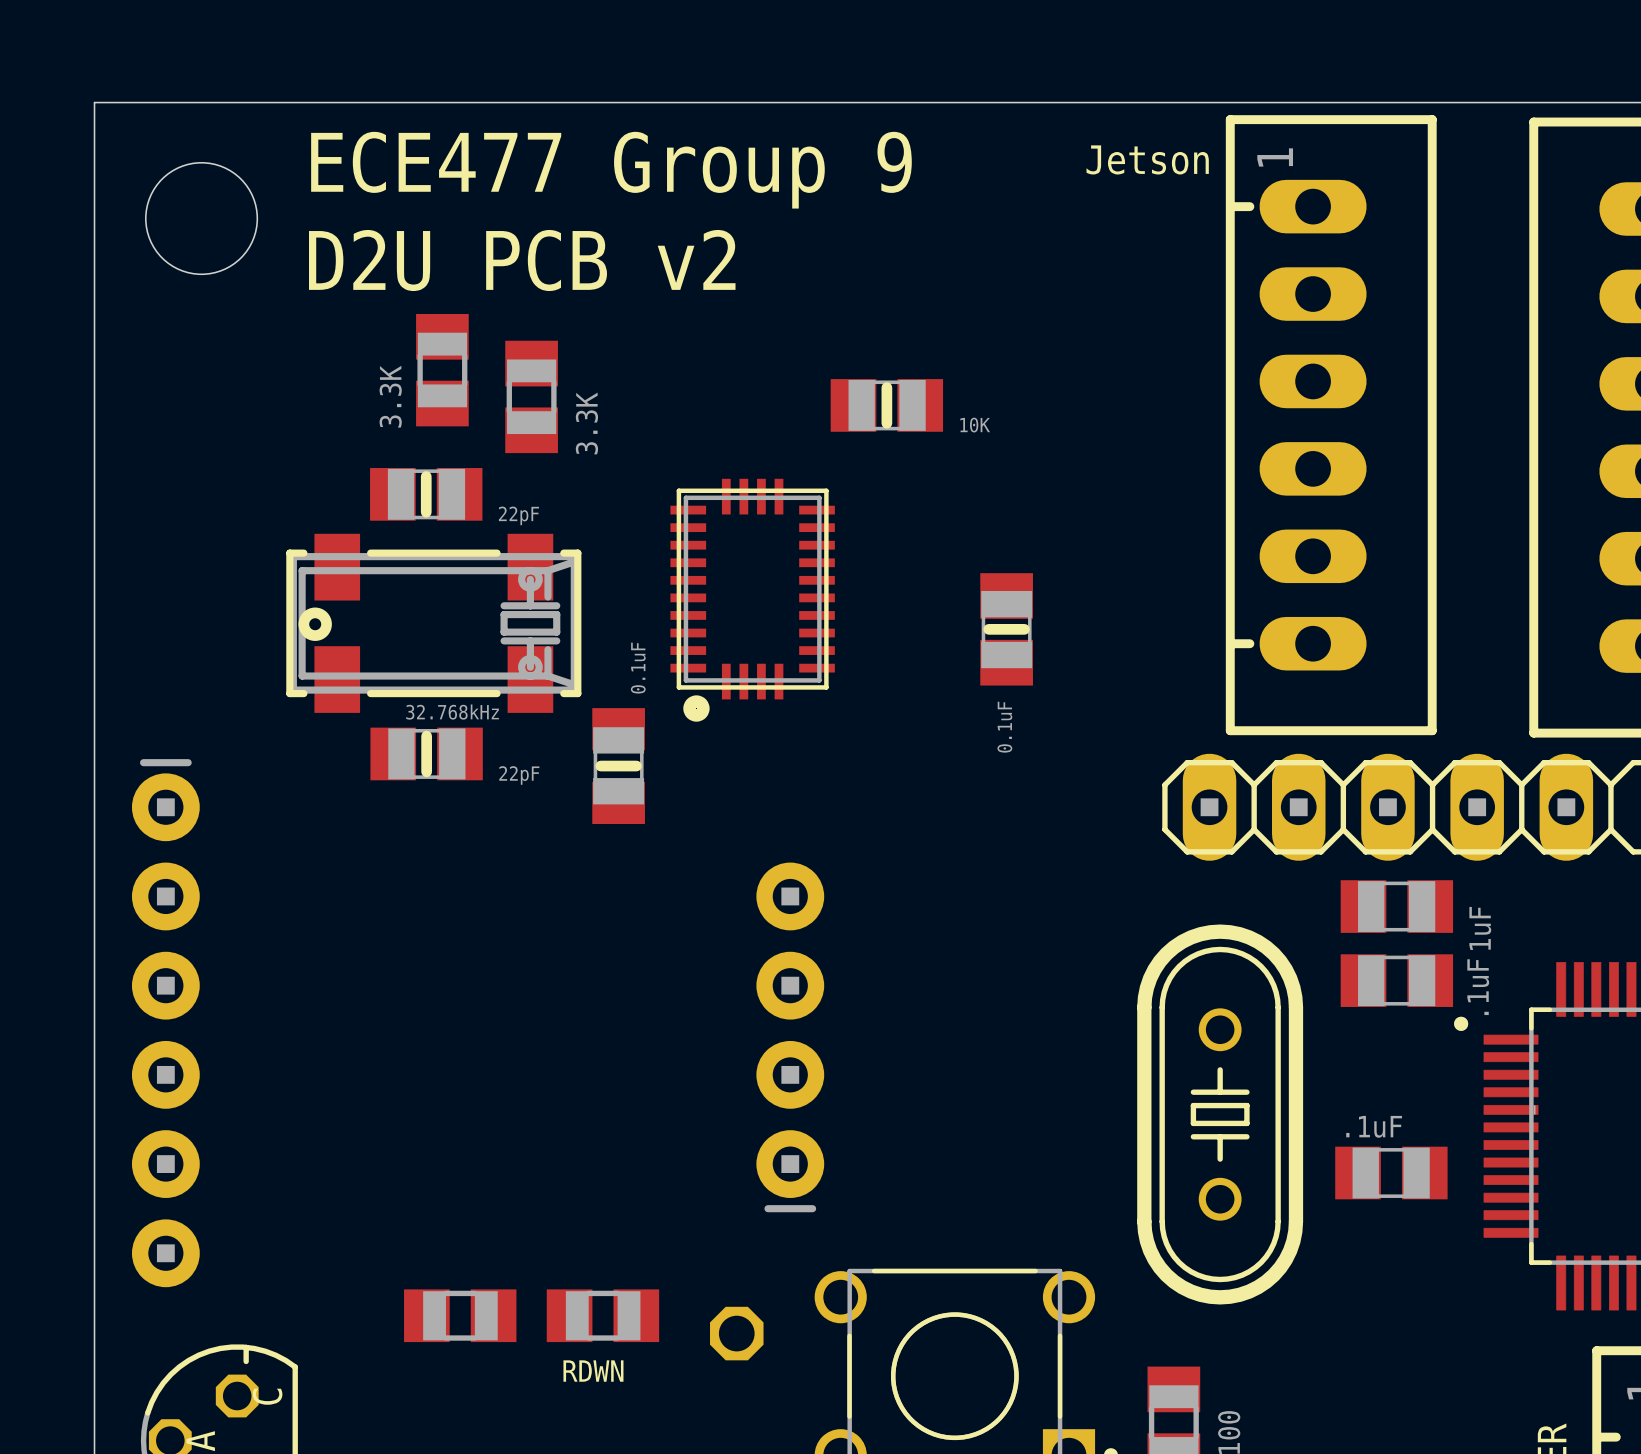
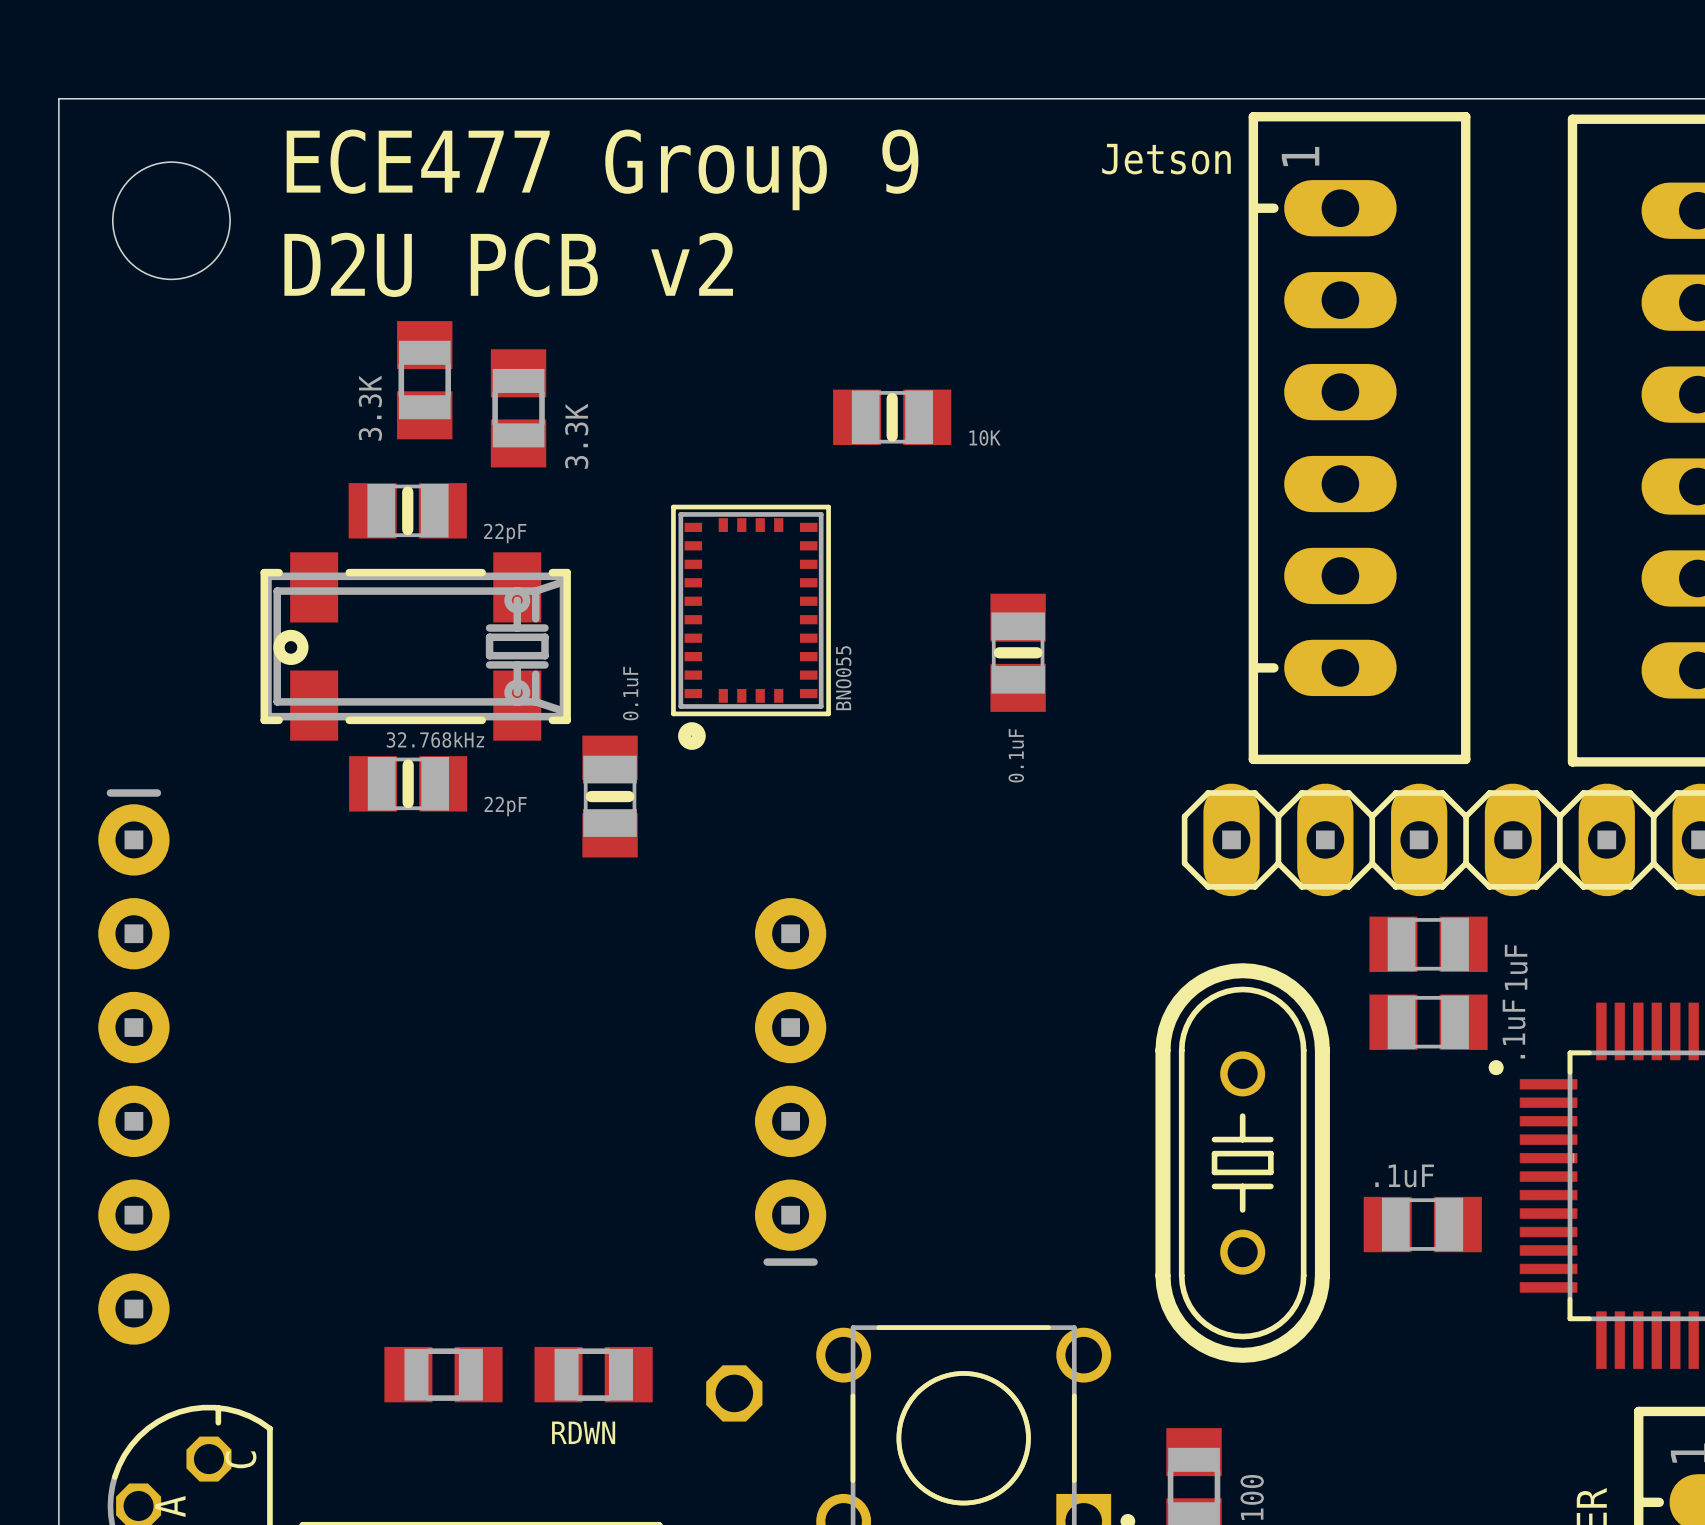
part footprint: [670, 478, 835, 722] -> [671, 504, 831, 750]
part value: none -> BNO055 (843, 678)

